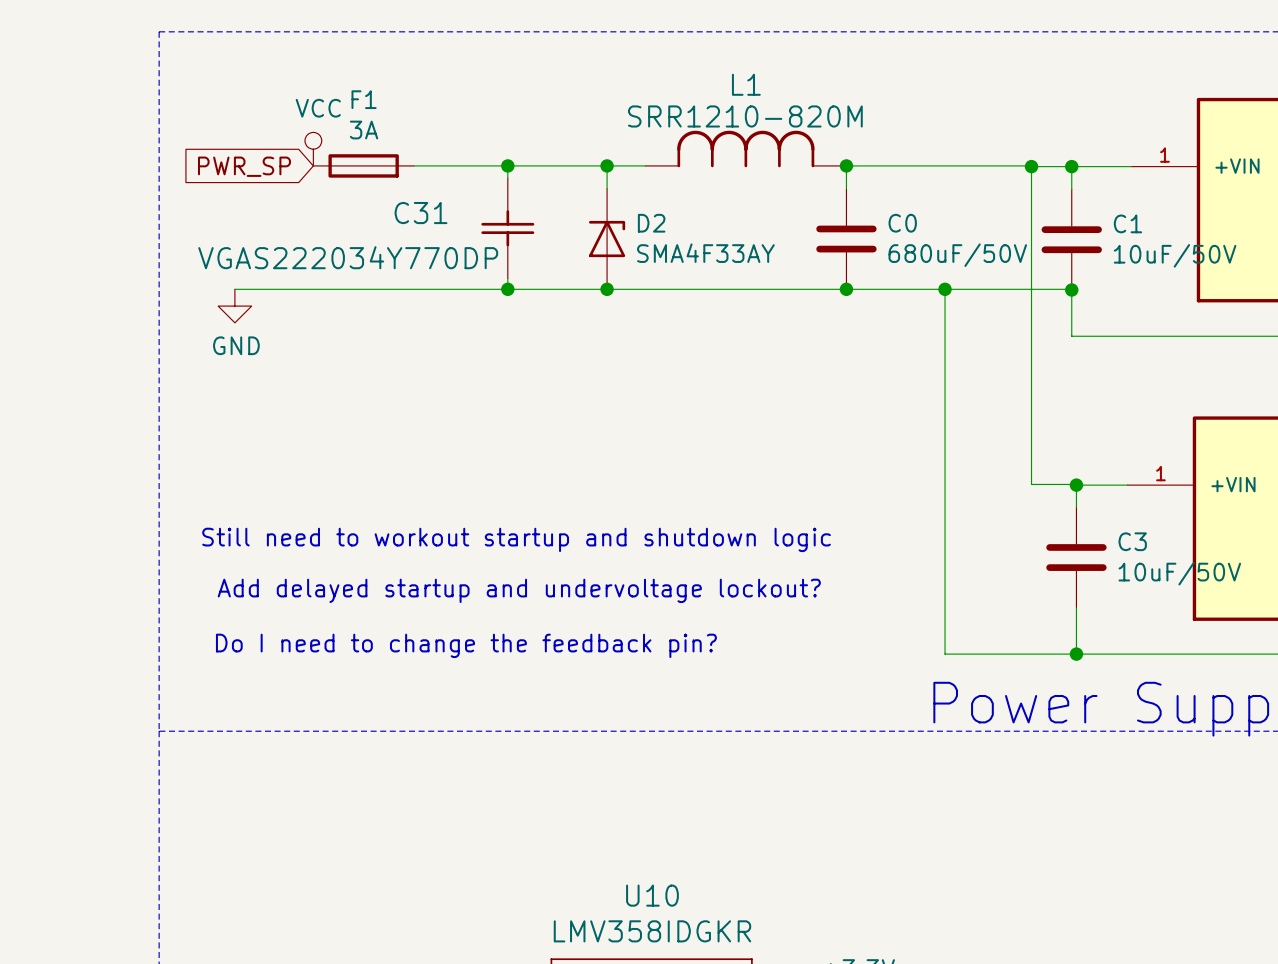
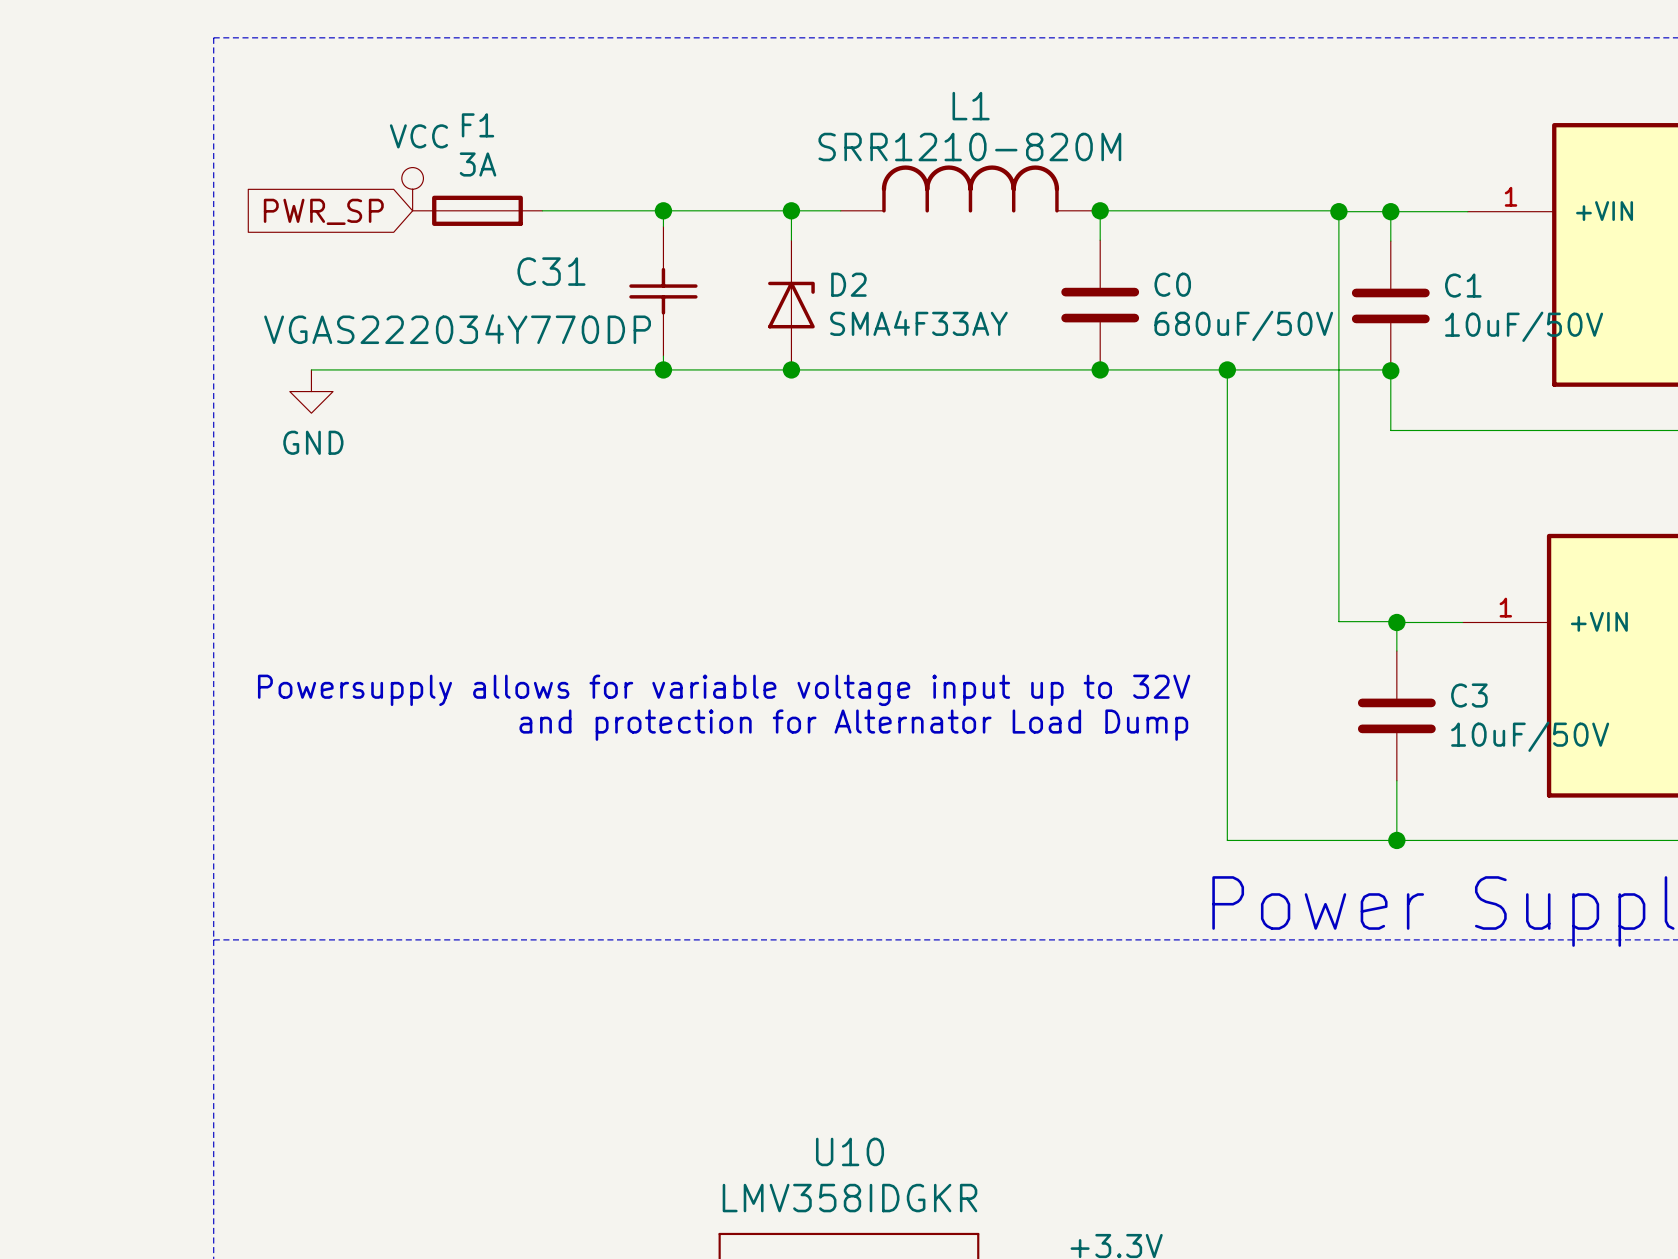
text: none -> Powersupply allows for variable voltage input up to 32V (724, 690)
text: Still need to workout startup and shutdown logic (516, 539) -> none
text: none -> and protection for Alternator Load Dump (853, 725)
text: Add delayed startup and undervoltage lockout? (519, 590) -> none
text: Do I need to change the feedback pin? (466, 645) -> none

